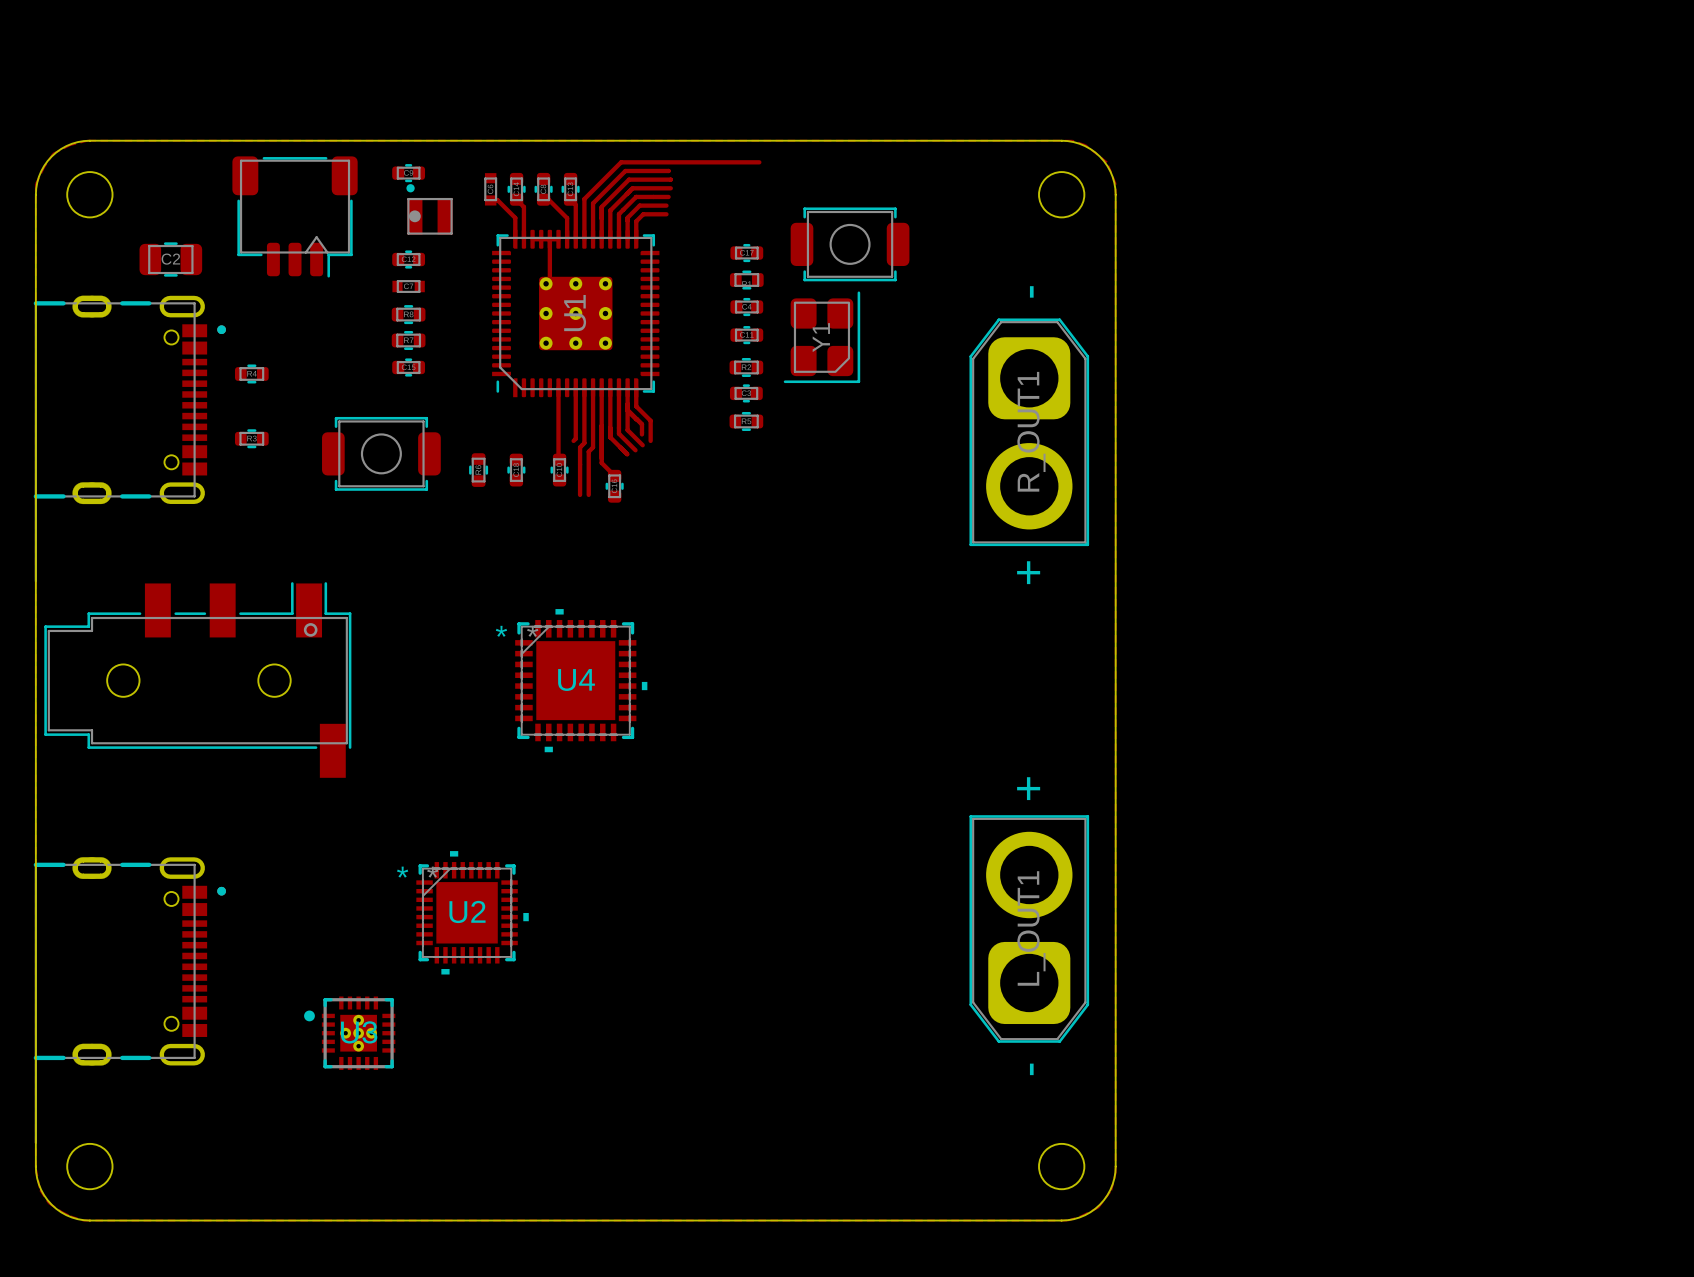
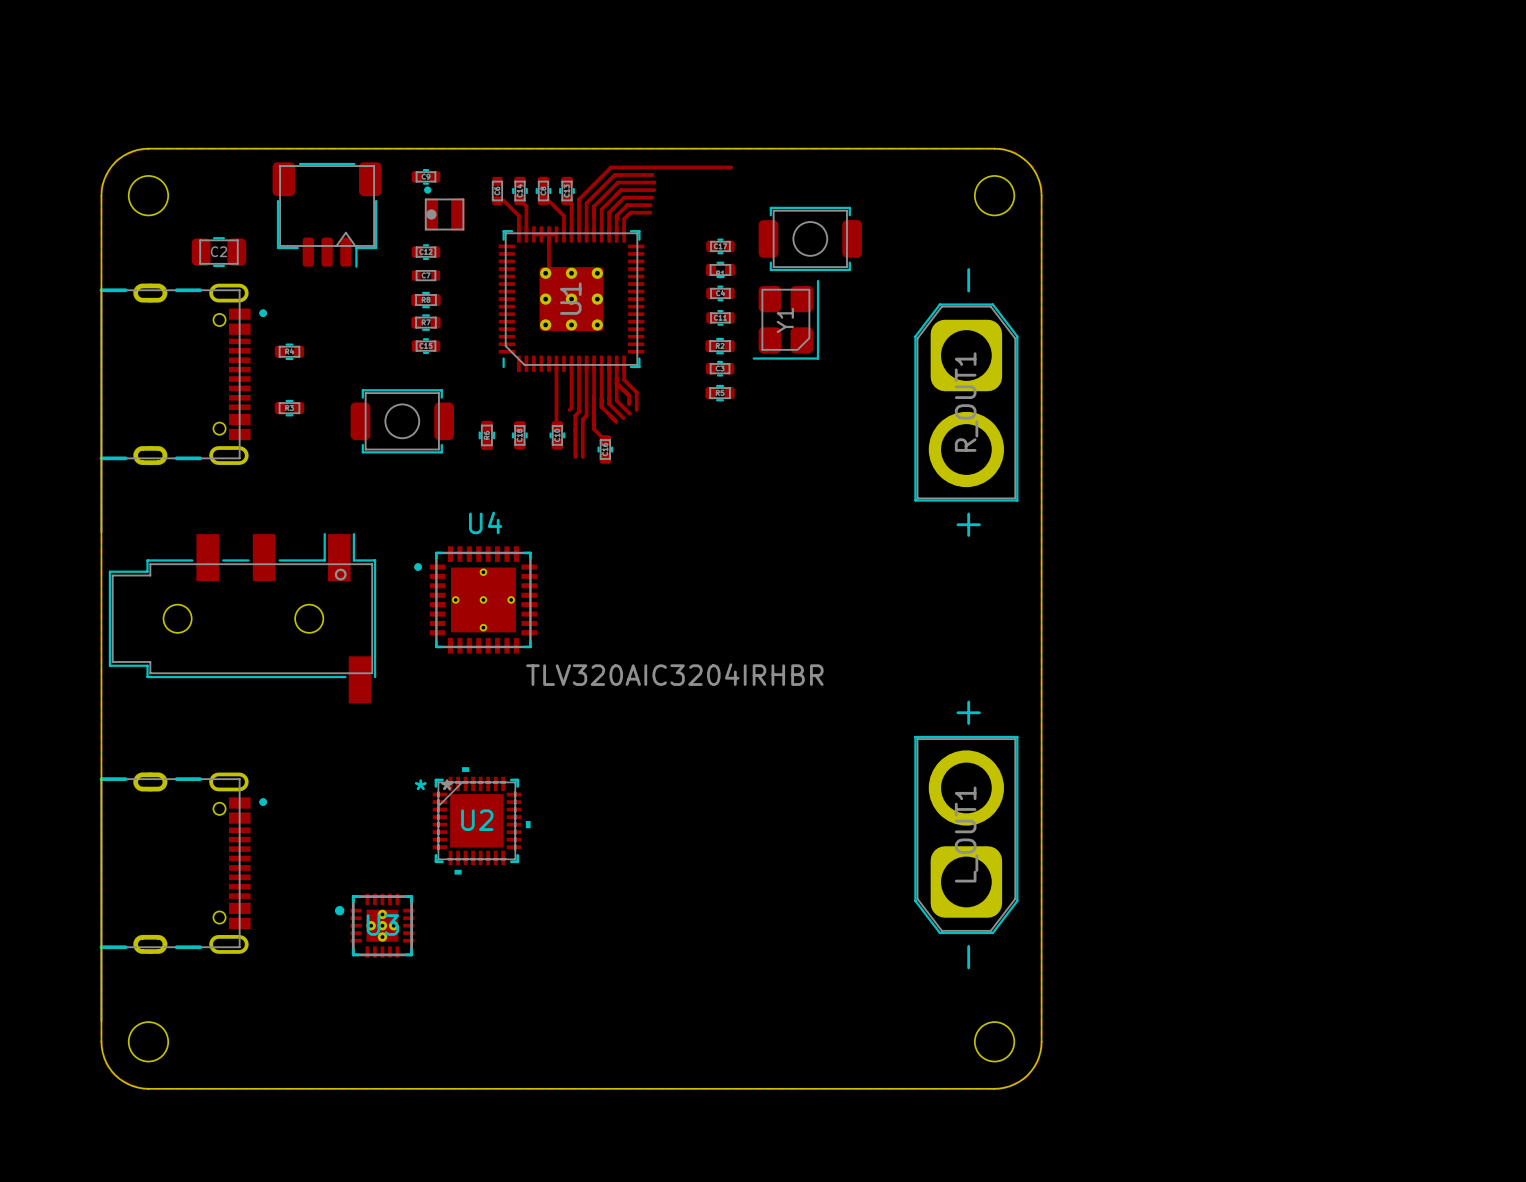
U4 footprint: [515, 609, 648, 753] -> [414, 546, 538, 654]
U4 name position: U4 (576, 679) -> U4 (485, 522)
U4 value: none -> TLV320AIC3204IRHBR (674, 674)

